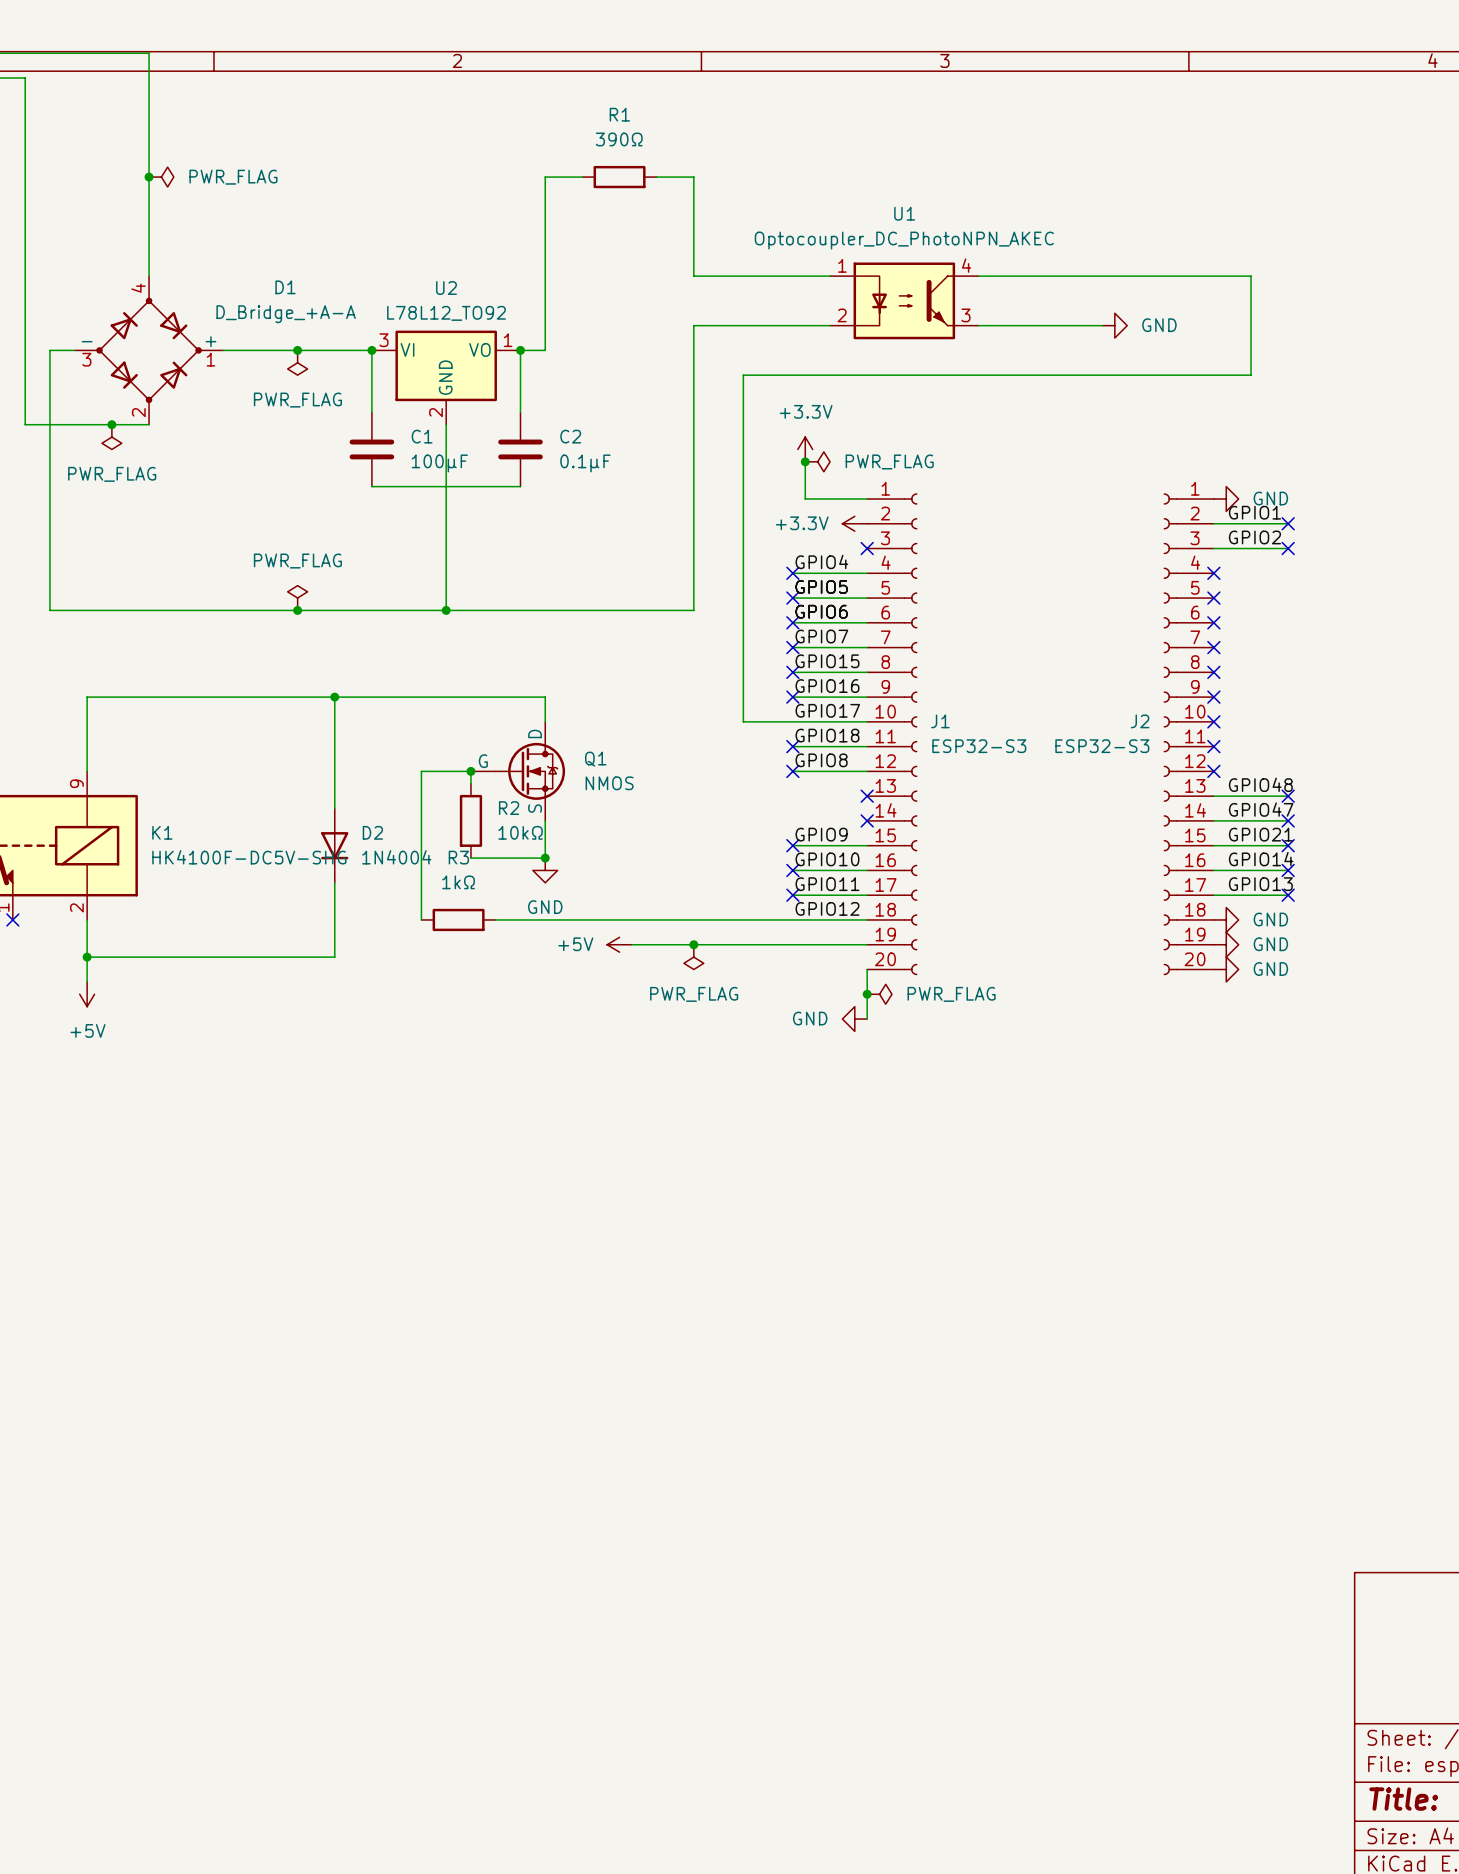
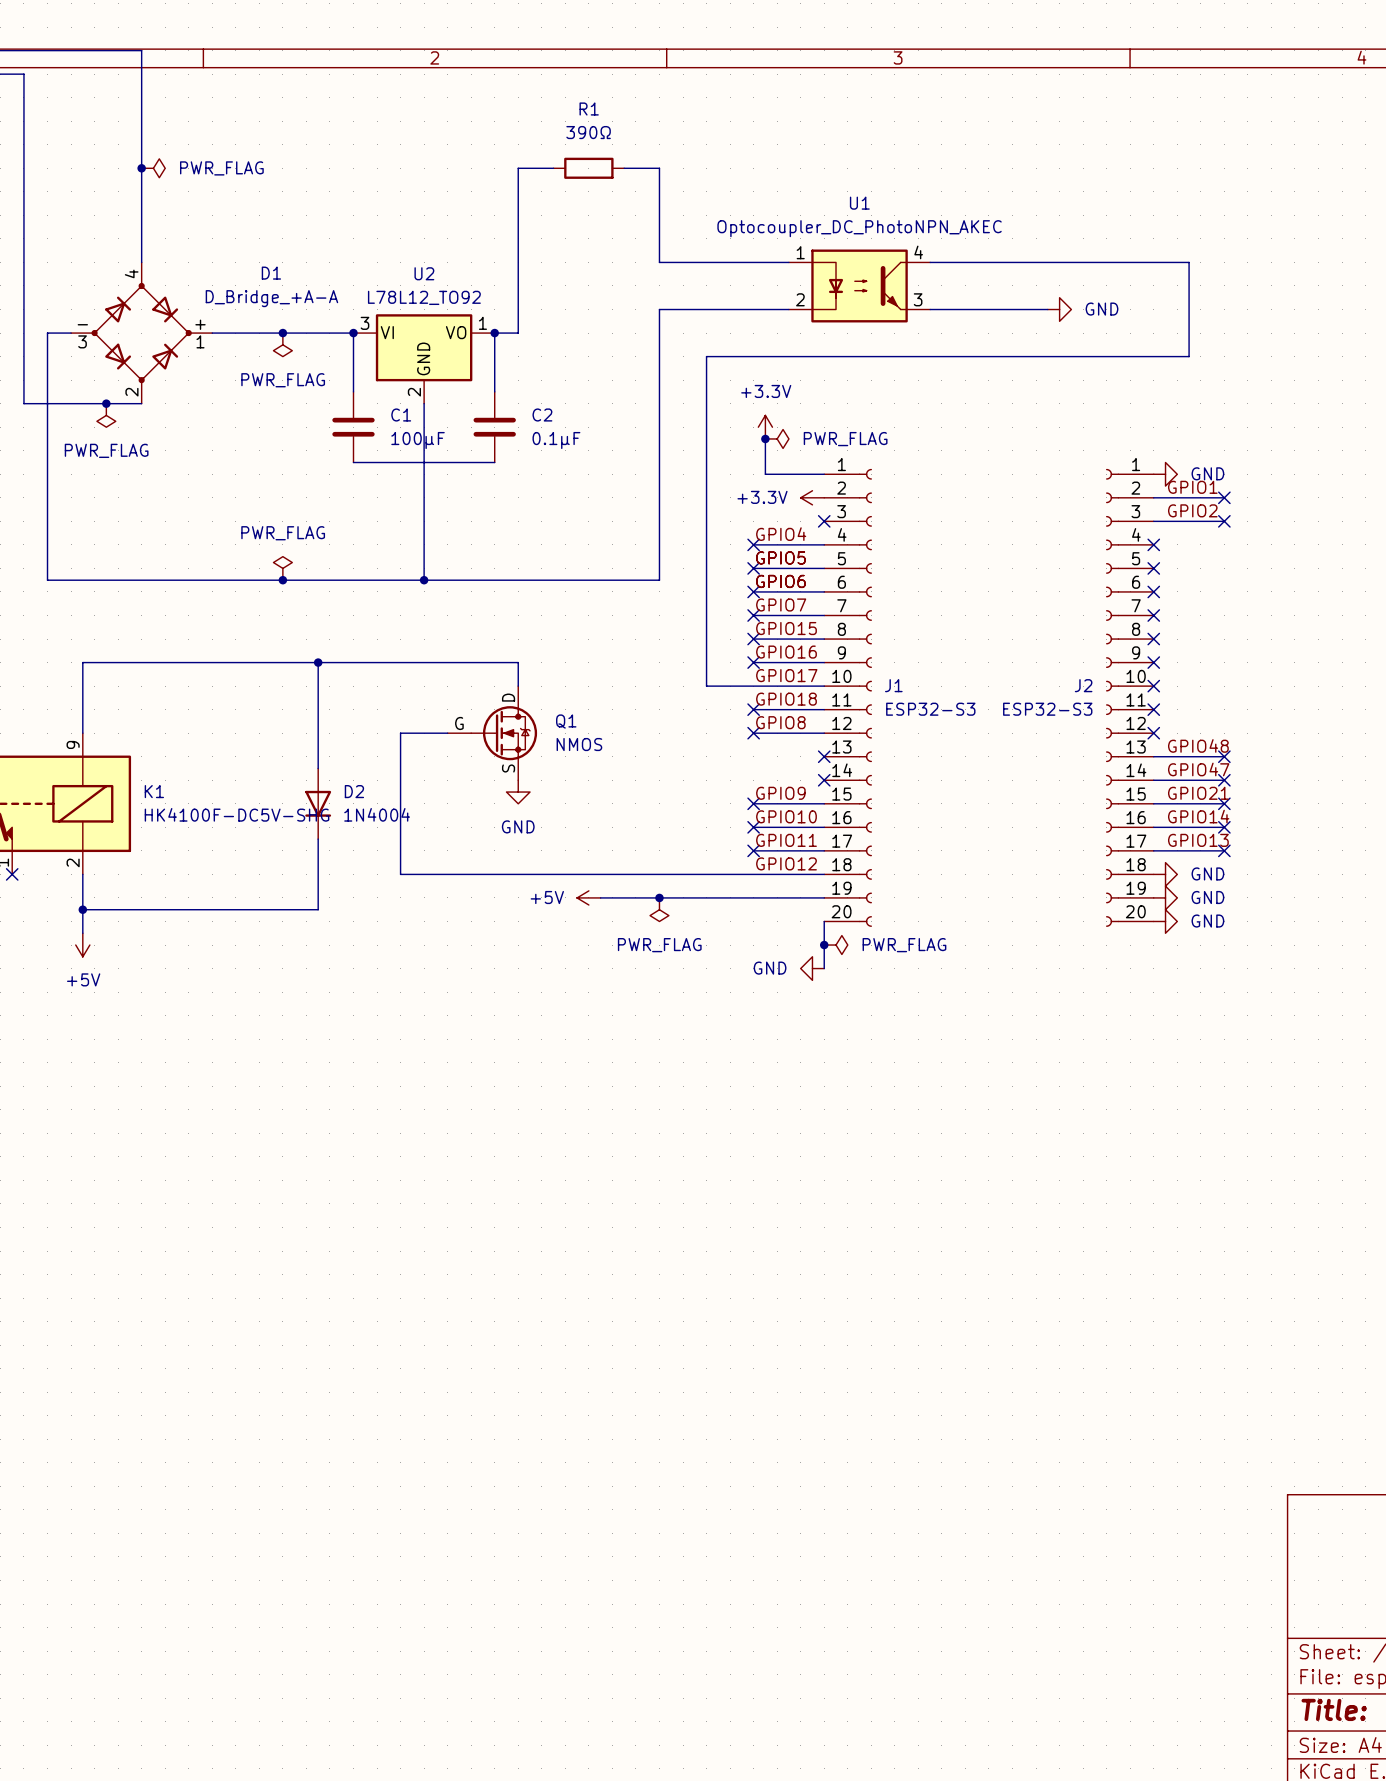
wire: (470, 771) (470, 783) -> none
junction: (470, 771) -> none
R2: 10kΩ (470, 820) -> none
wire: (545, 820) (545, 858) (470, 858) -> none
junction: (545, 858) -> none
power symbol position: GND (545, 870) -> GND (518, 792)
wire: none -> (400, 874) (471, 874)
R3: 1kΩ (458, 919) -> none

